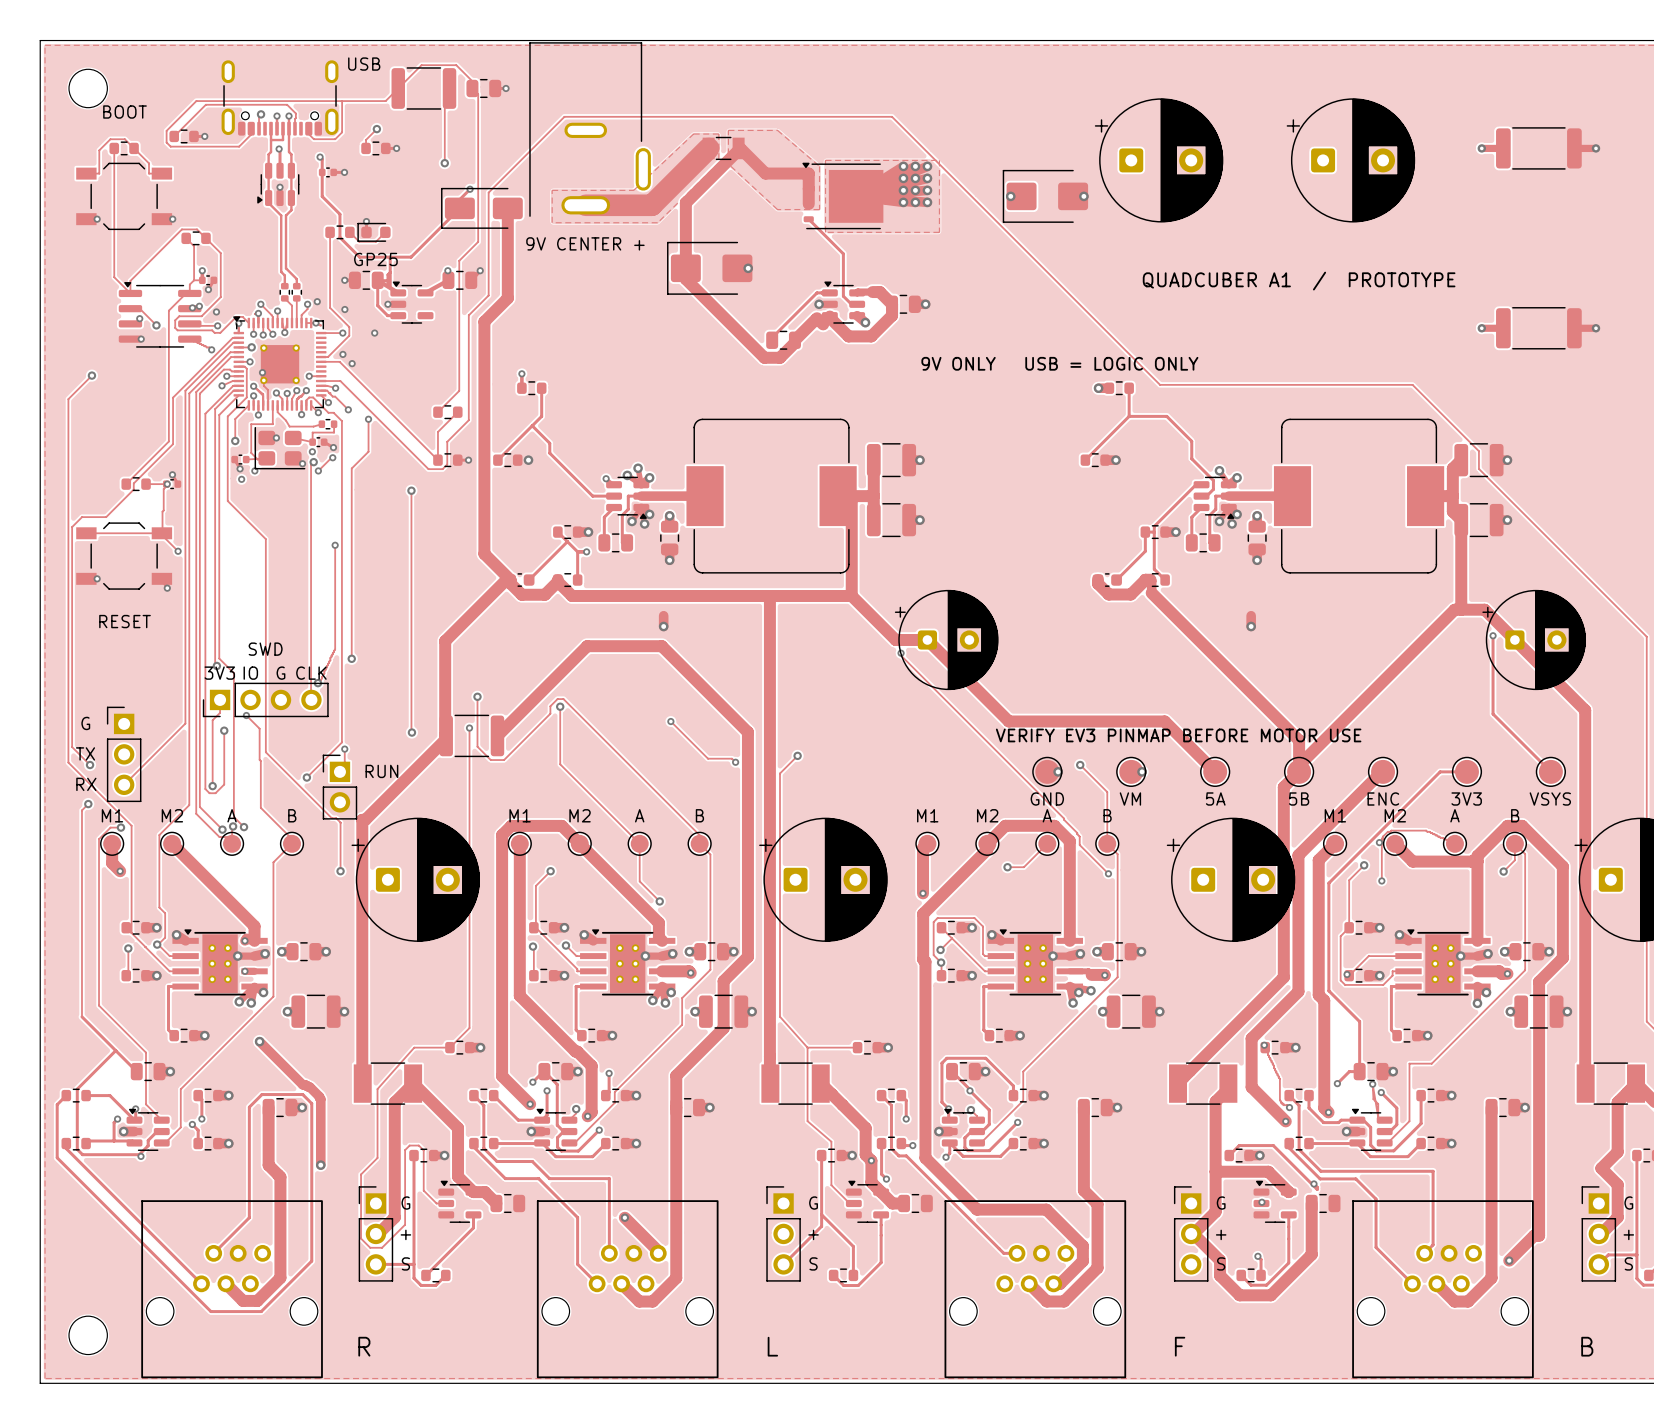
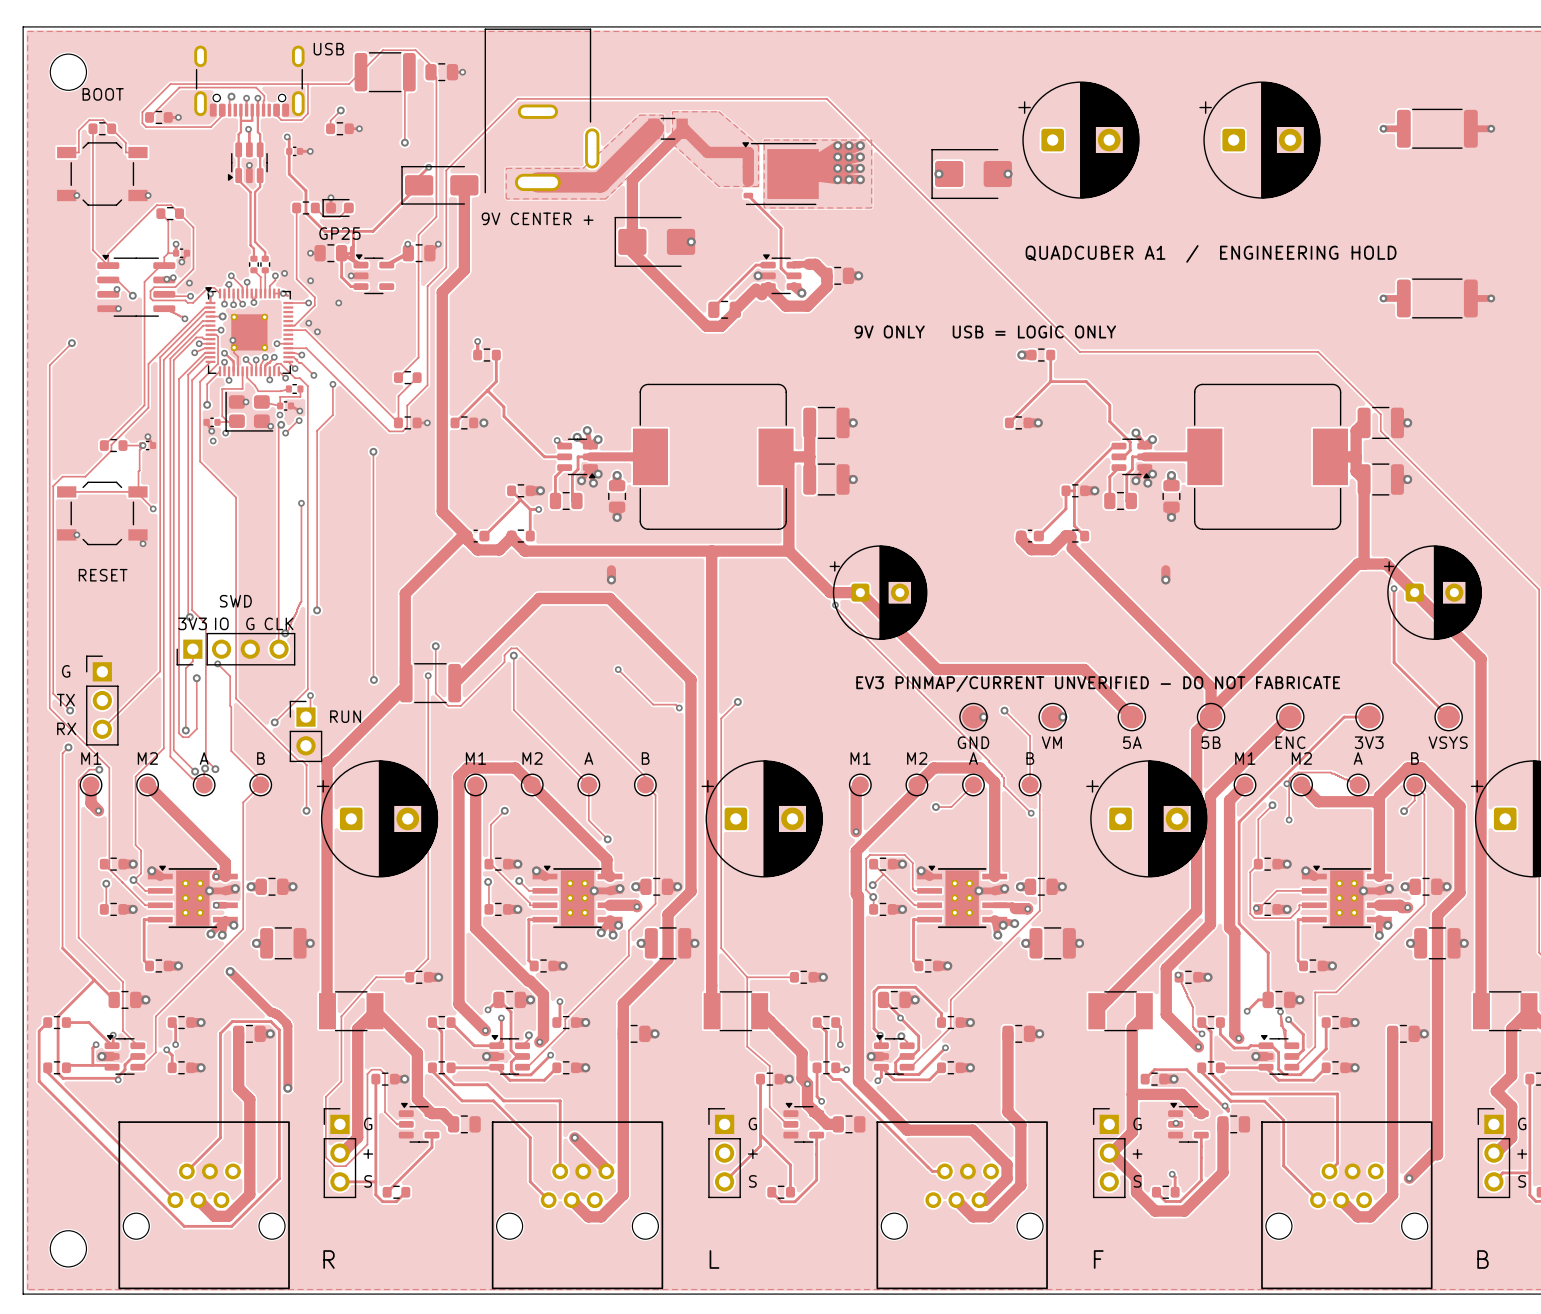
text: QUADCUBER A1 / PROTOTYPE (1299, 281) -> QUADCUBER A1 / ENGINEERING HOLD (1211, 253)
text: VERIFY EV3 PINMAP BEFORE MOTOR USE (1178, 735) -> EV3 PINMAP/CURRENT UNVERIFIED - DO NOT FABRICATE (1098, 683)

